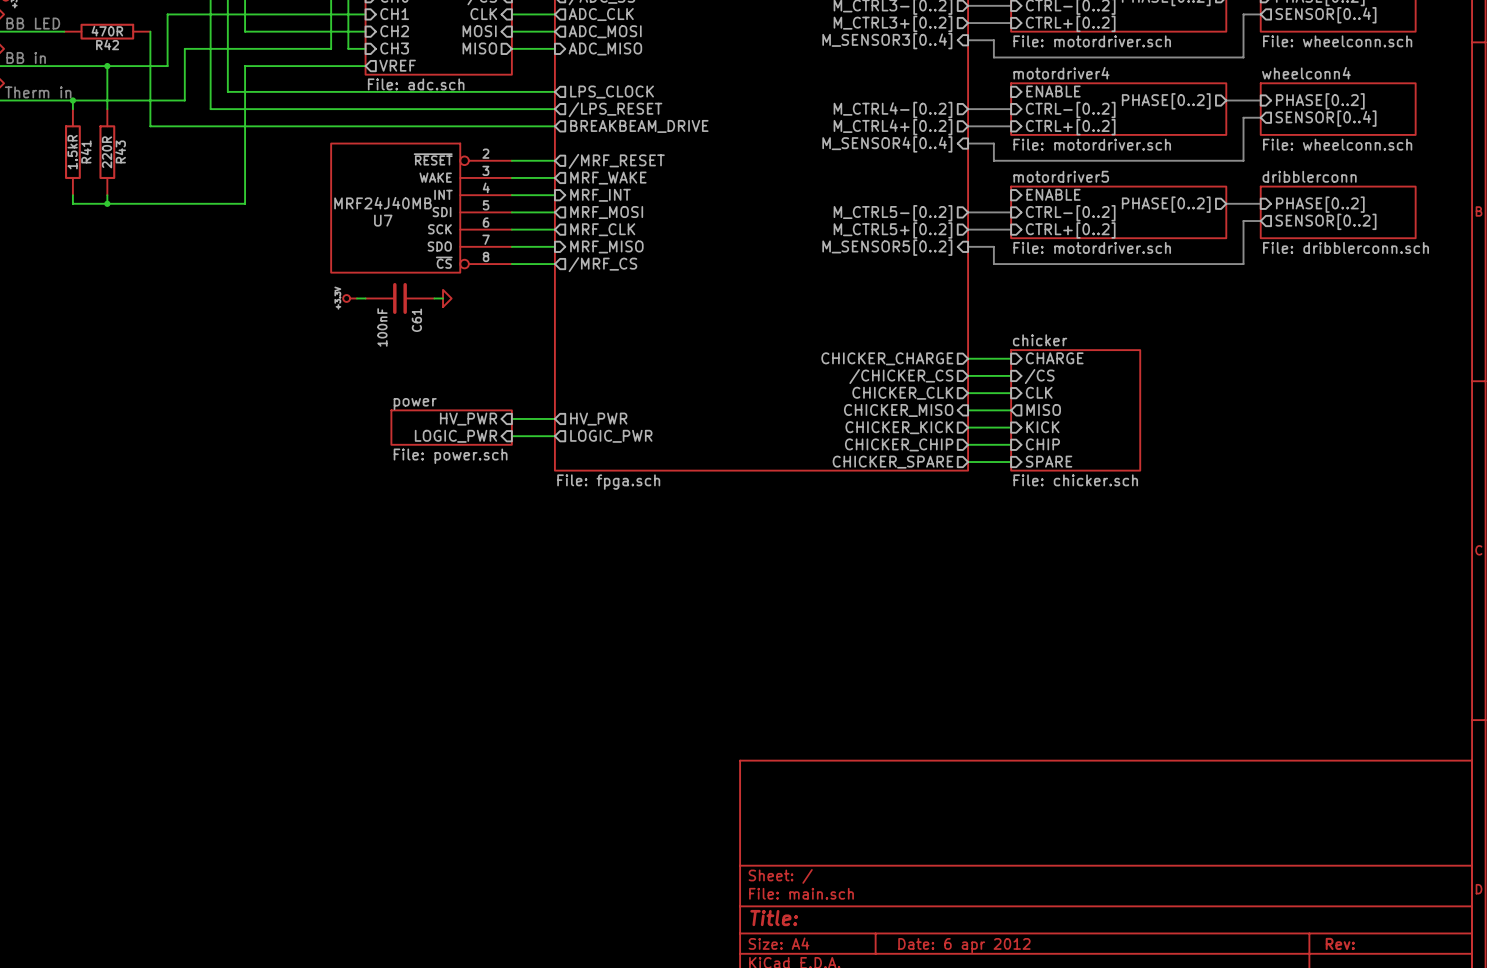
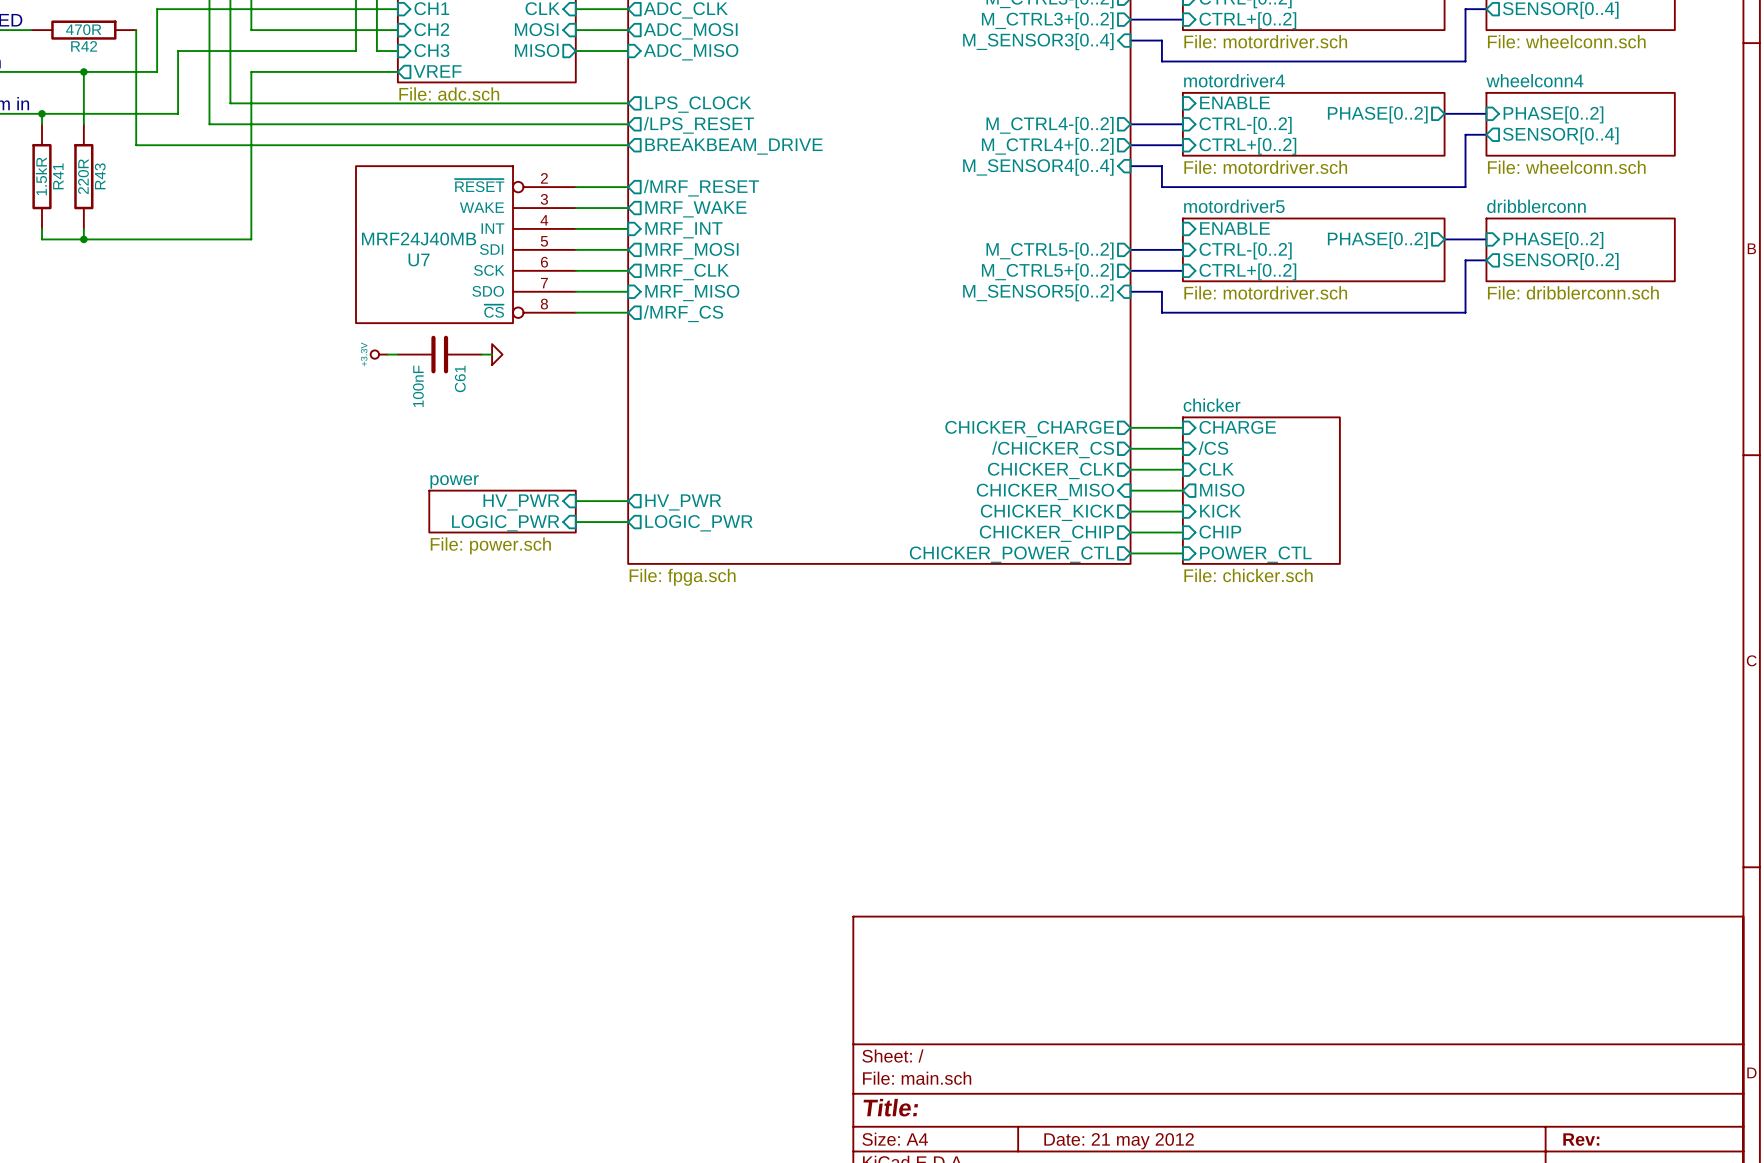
sheet pin: SPARE (1049, 461) -> POWER_CTL (1255, 554)
sheet pin: CHICKER_SPARE (893, 462) -> CHICKER_POWER_CTL (1012, 554)
title block: Date: 6 apr 2012 (964, 945) -> Date: 21 may 2012 (1119, 1141)

